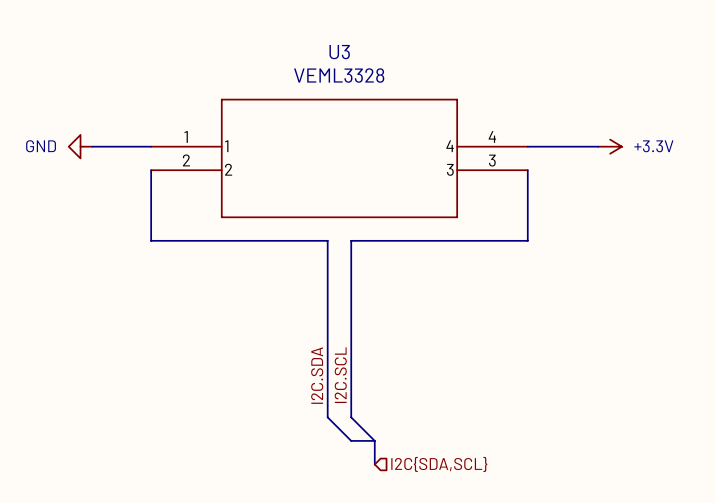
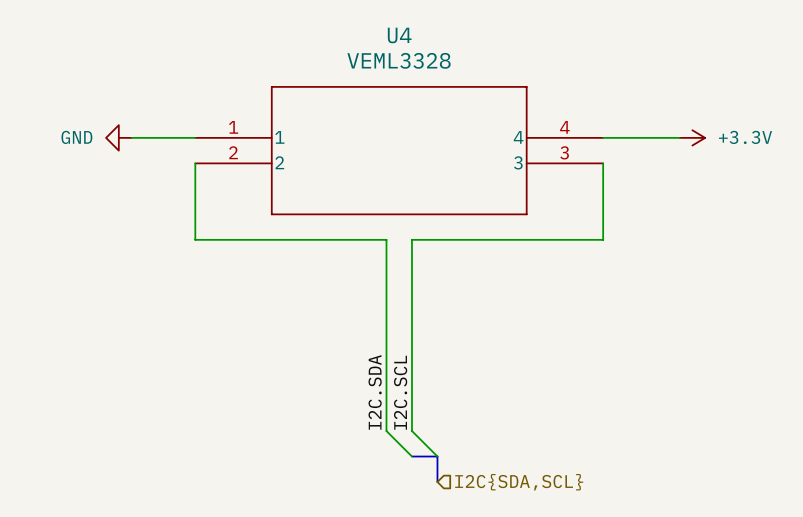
U3 name: U3 (339, 52) -> U4 (399, 35)

